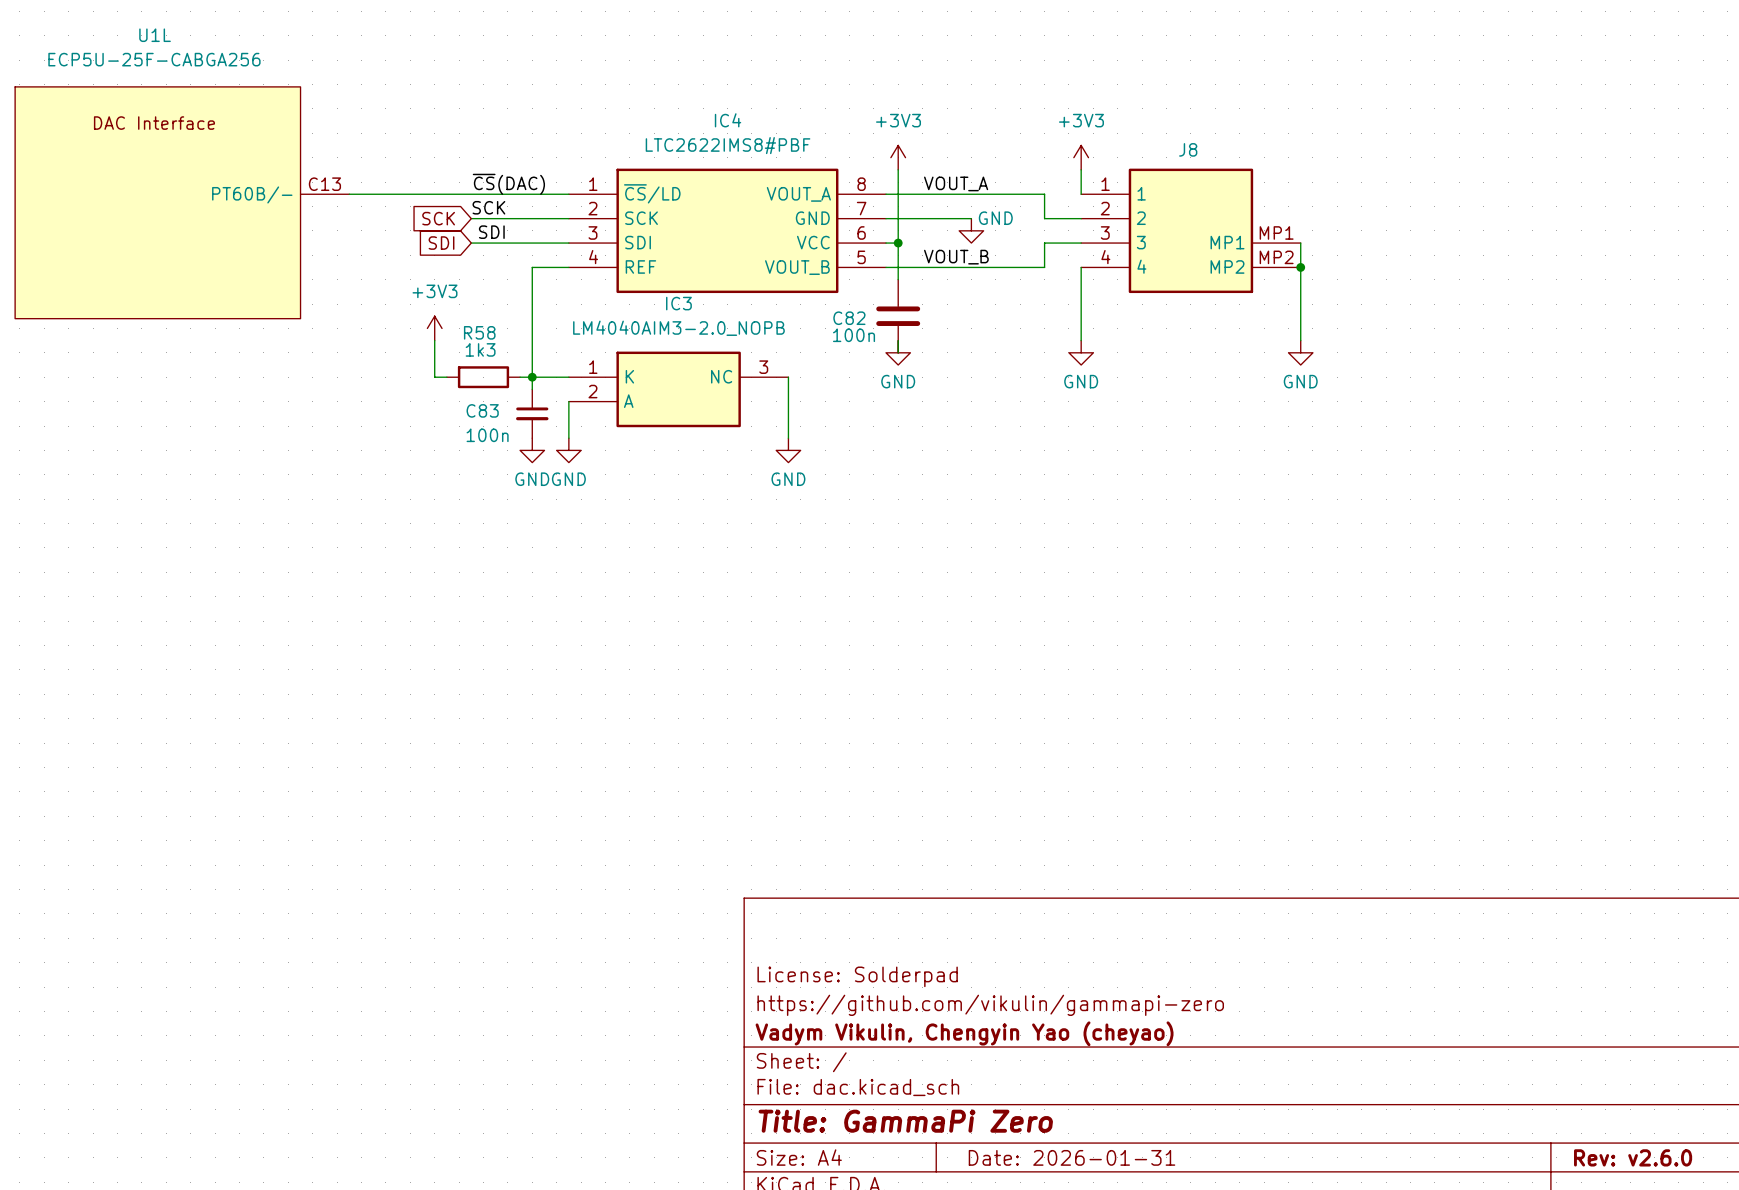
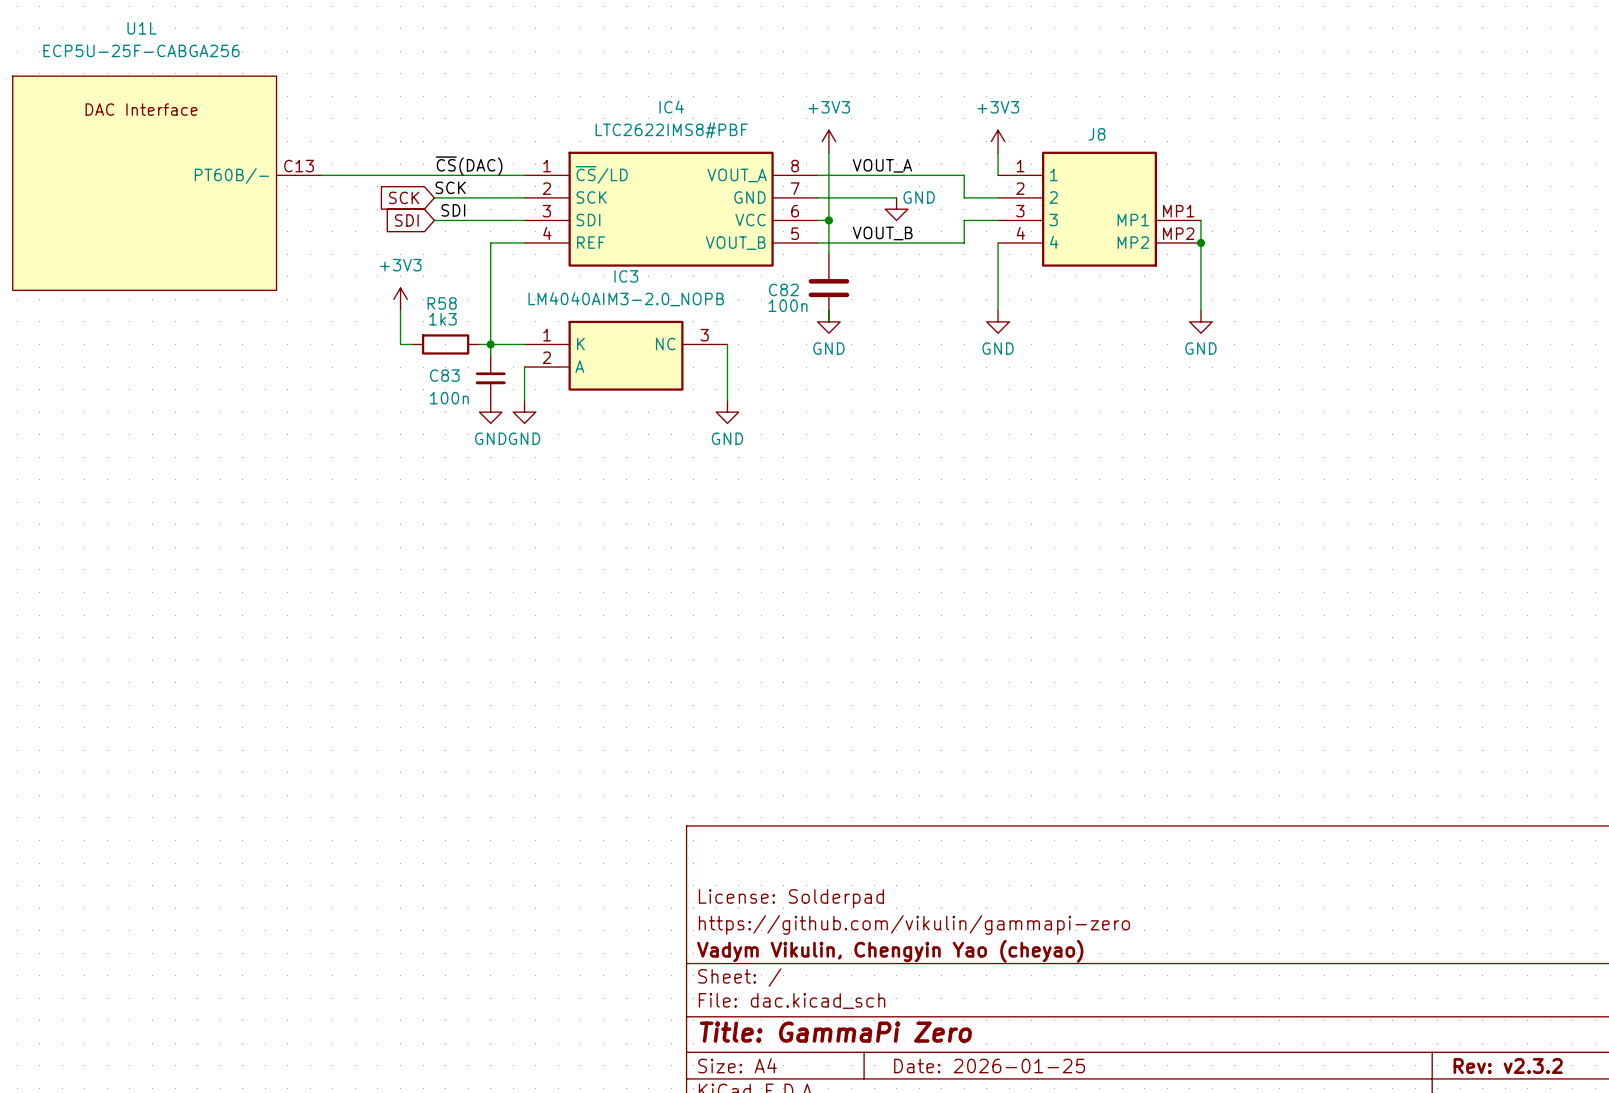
title block: Date: 2026-01-31 (1072, 1157) -> Date: 2026-01-25 (989, 1066)
title block: Rev: v2.6.0 (1633, 1157) -> Rev: v2.3.2 (1508, 1066)

